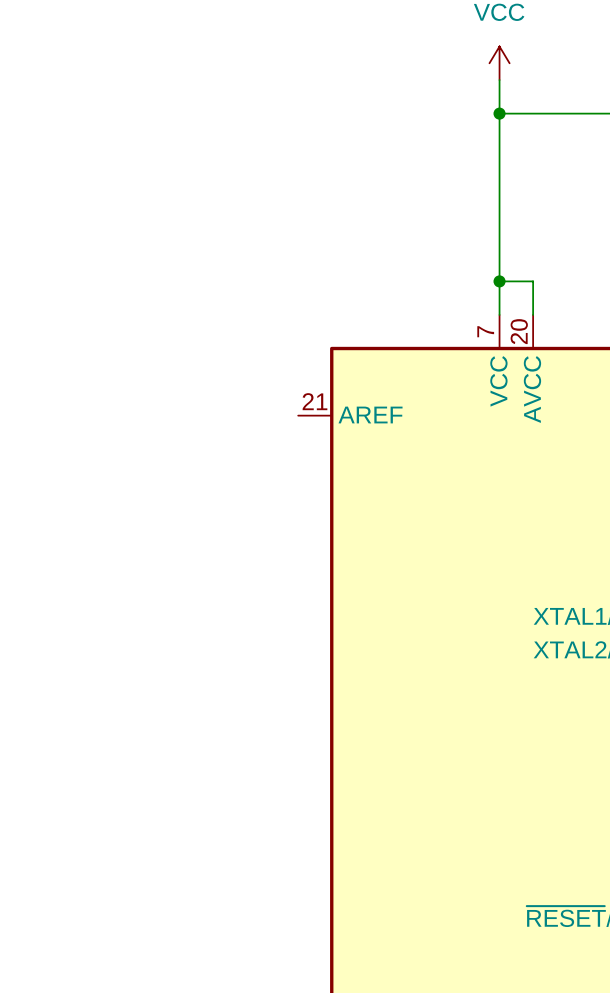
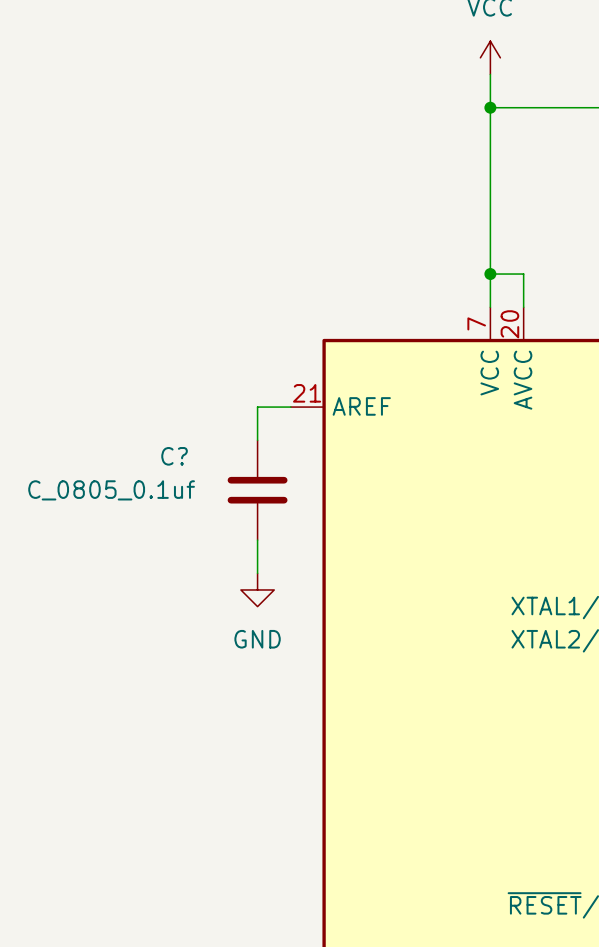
wire: none -> (290, 407) (257, 407) (257, 440)
C?: none -> C_0805_0.1uf (257, 490)
wire: none -> (257, 540) (257, 573)
power symbol: none -> GND (257, 589)

